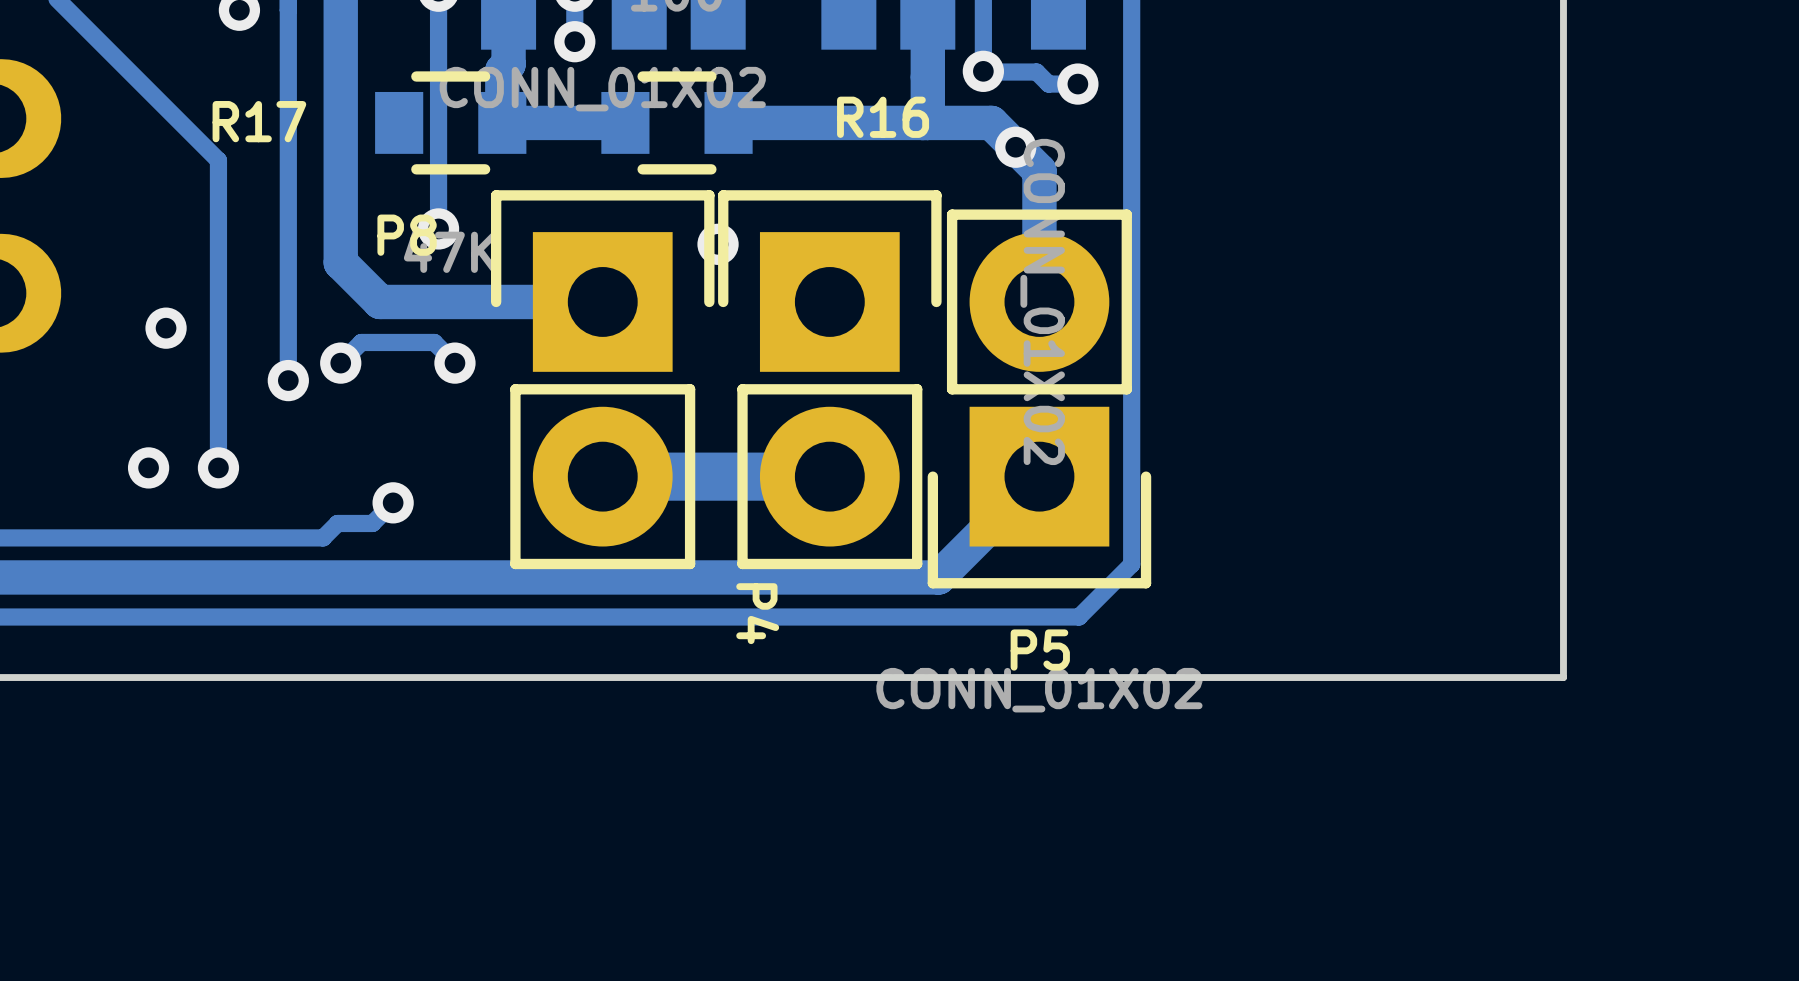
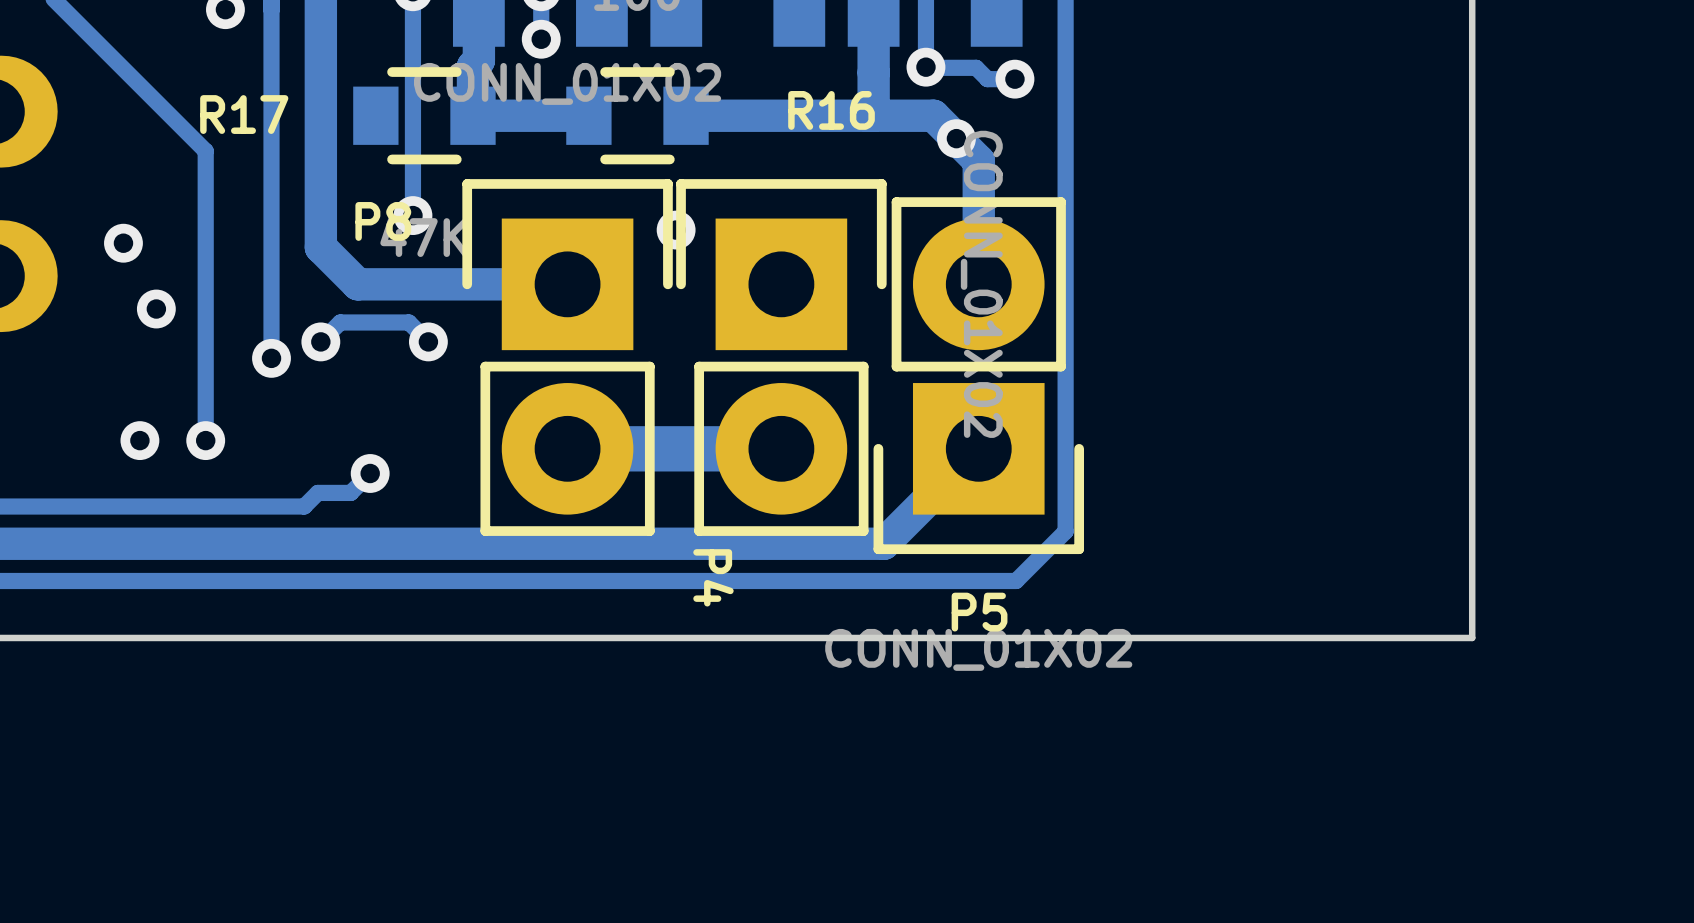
via: none -> (123, 243)

